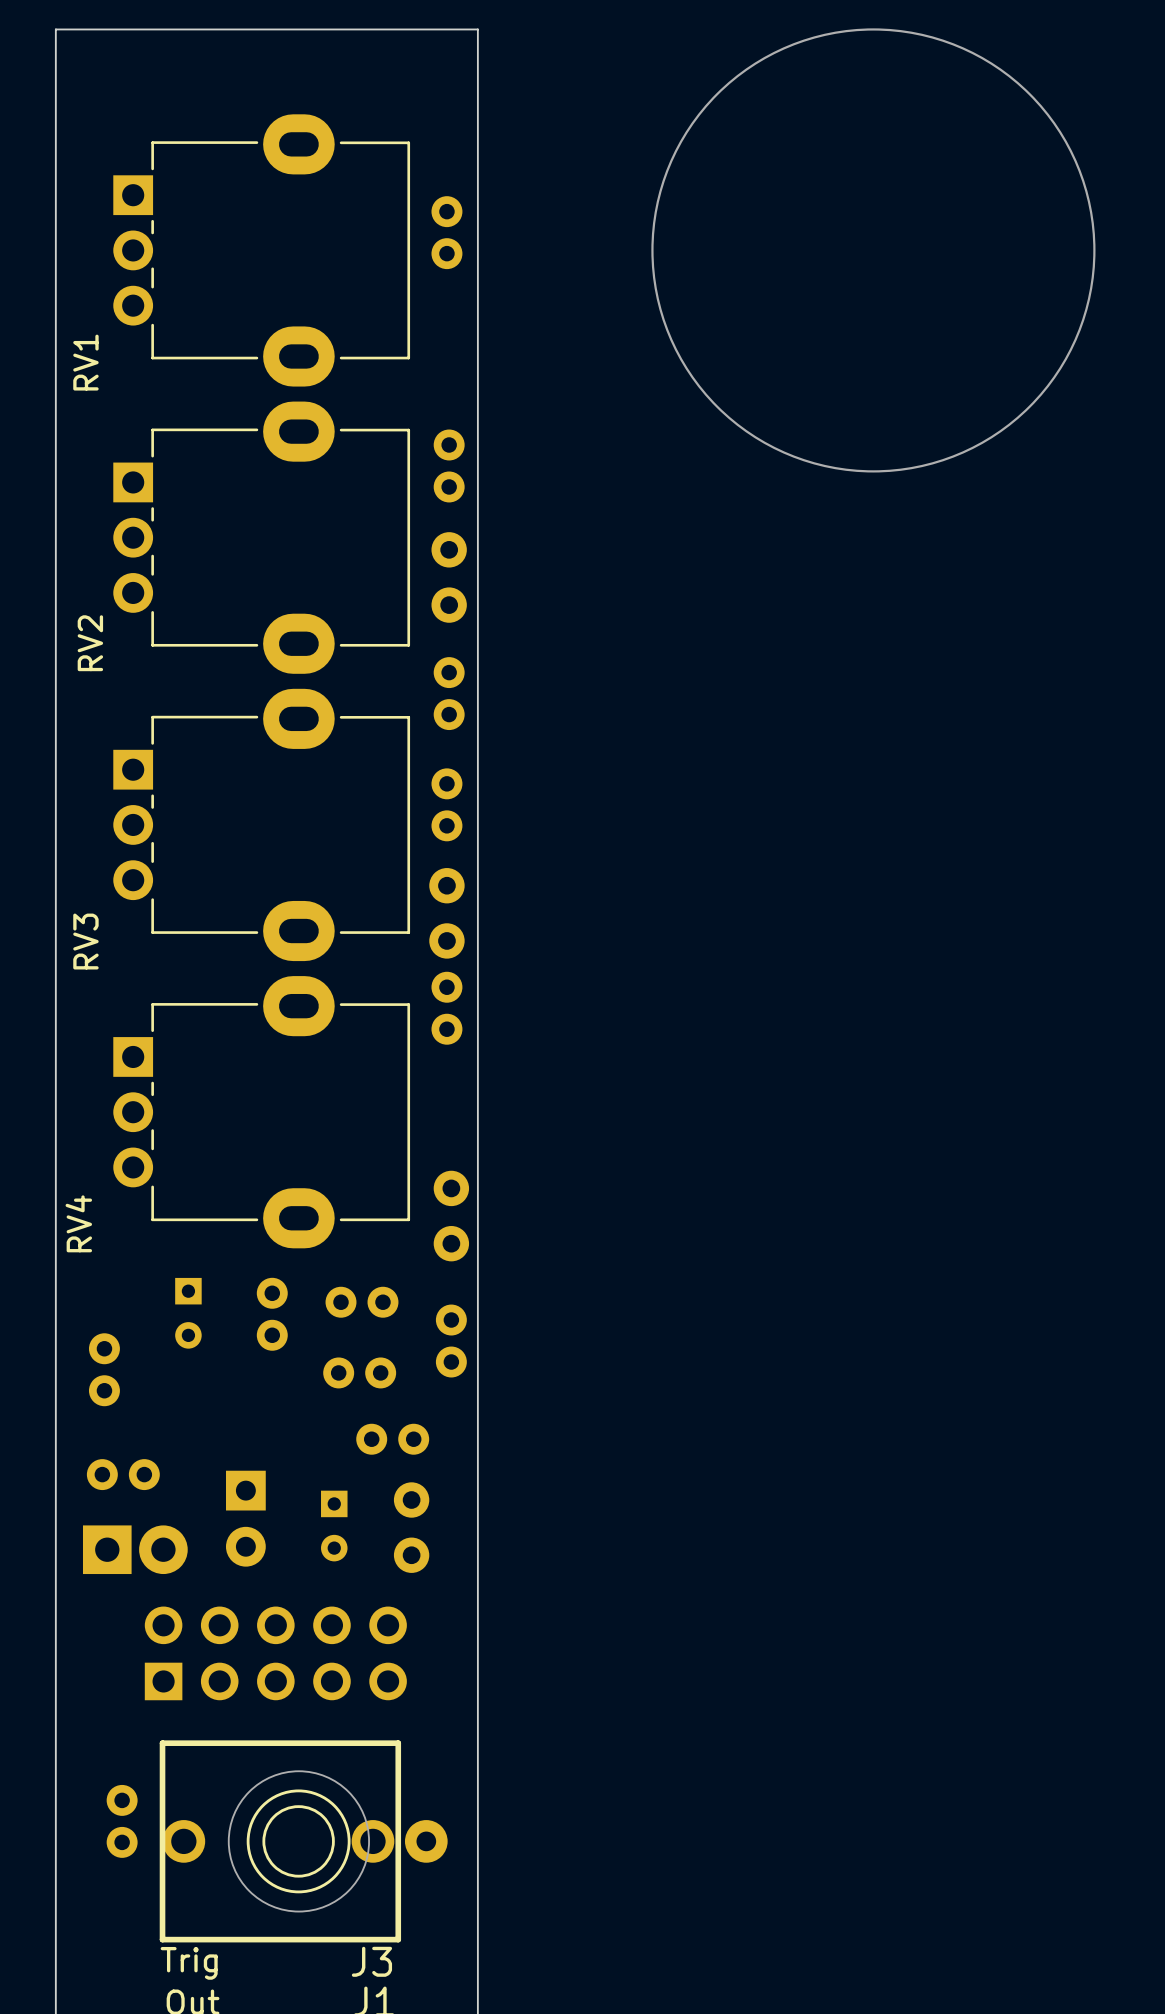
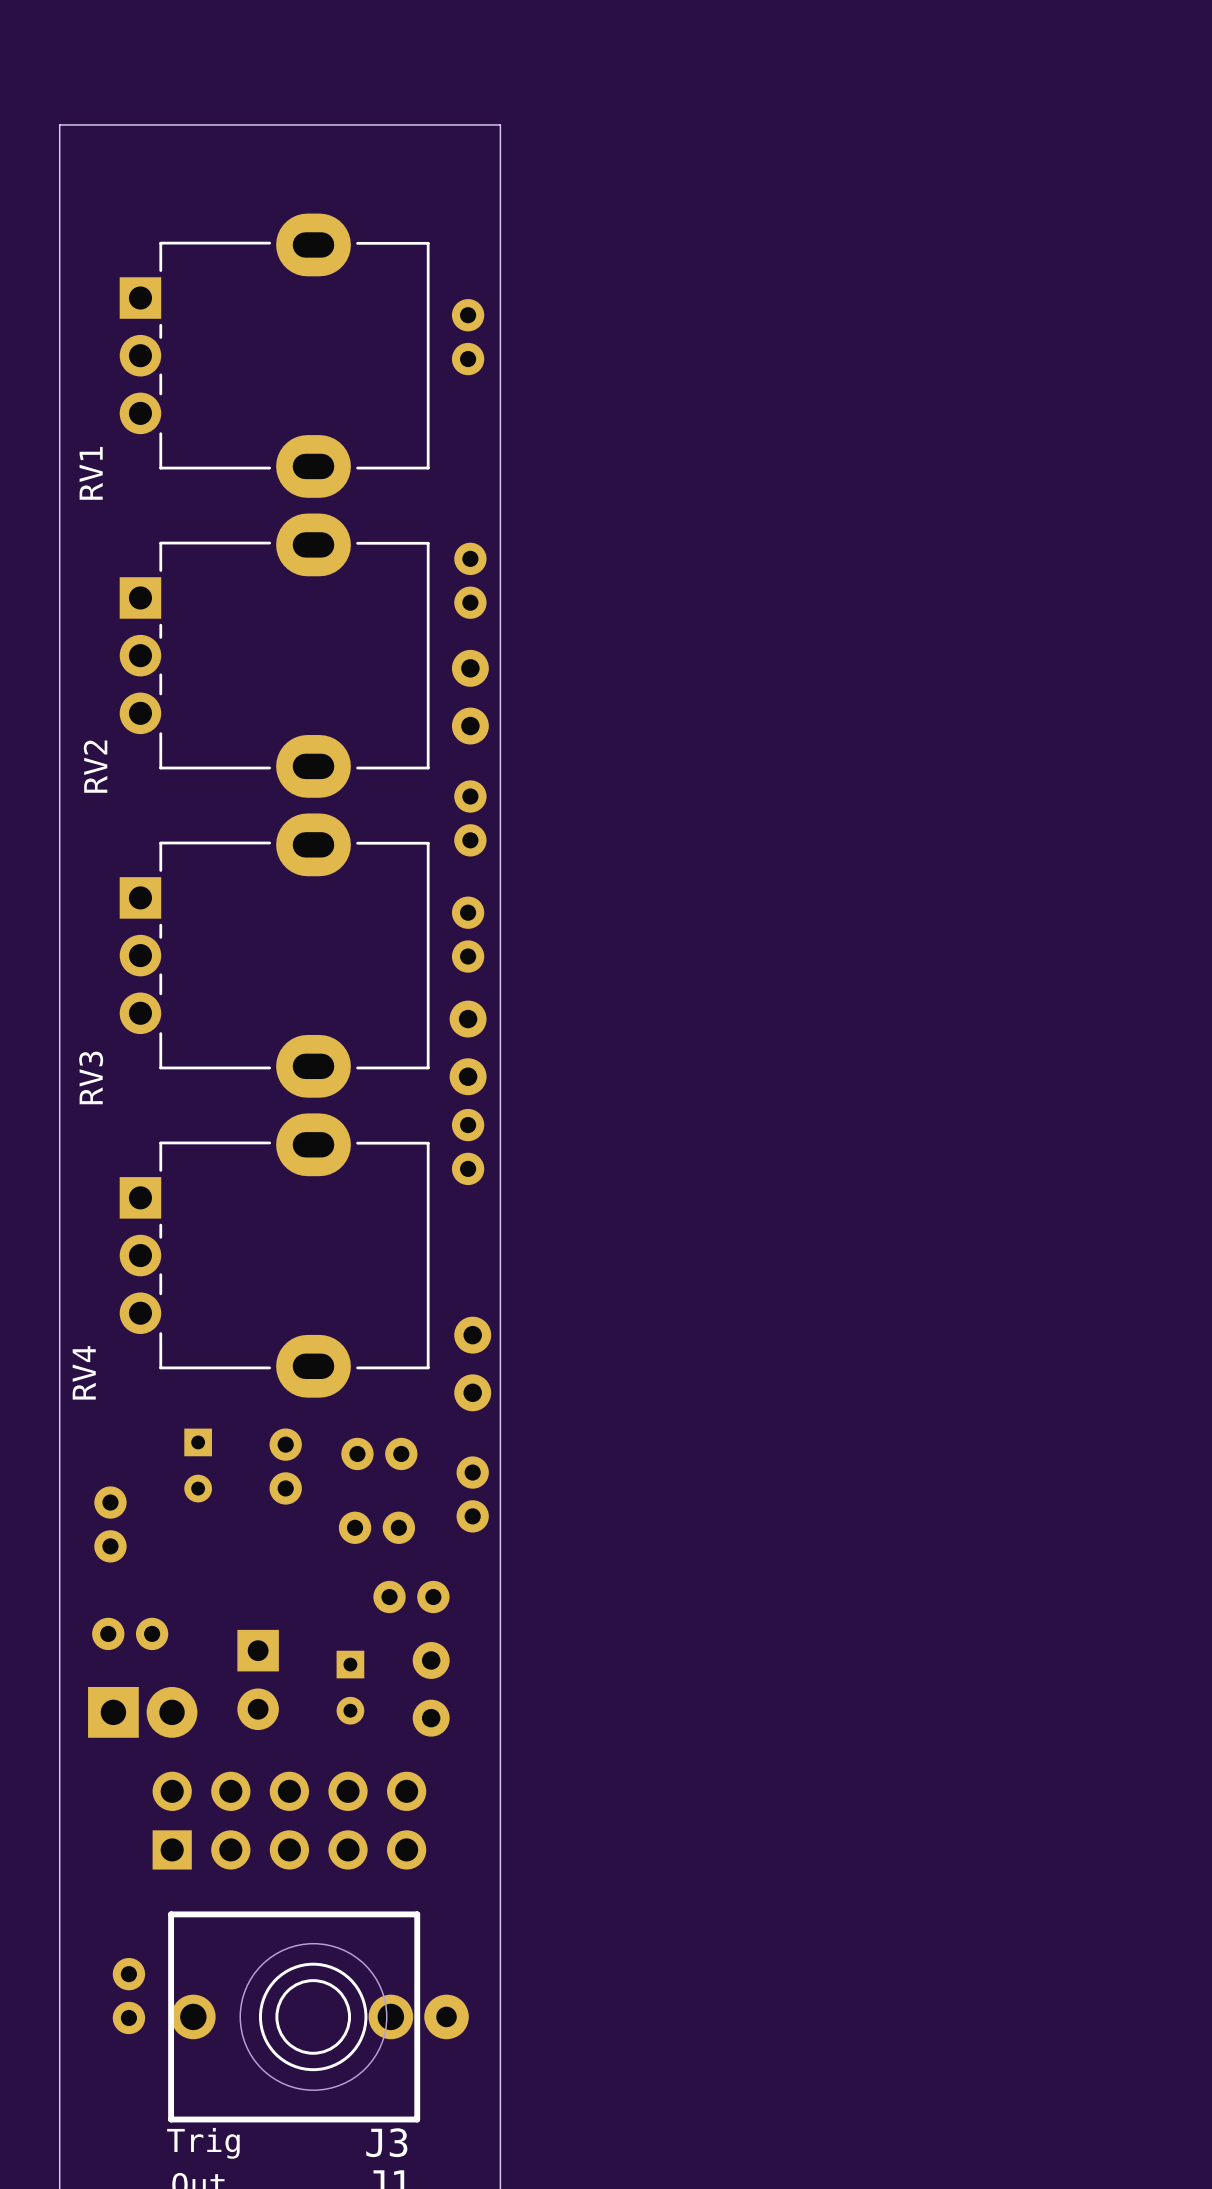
drawing: [651, 28, 1096, 473] -> none

